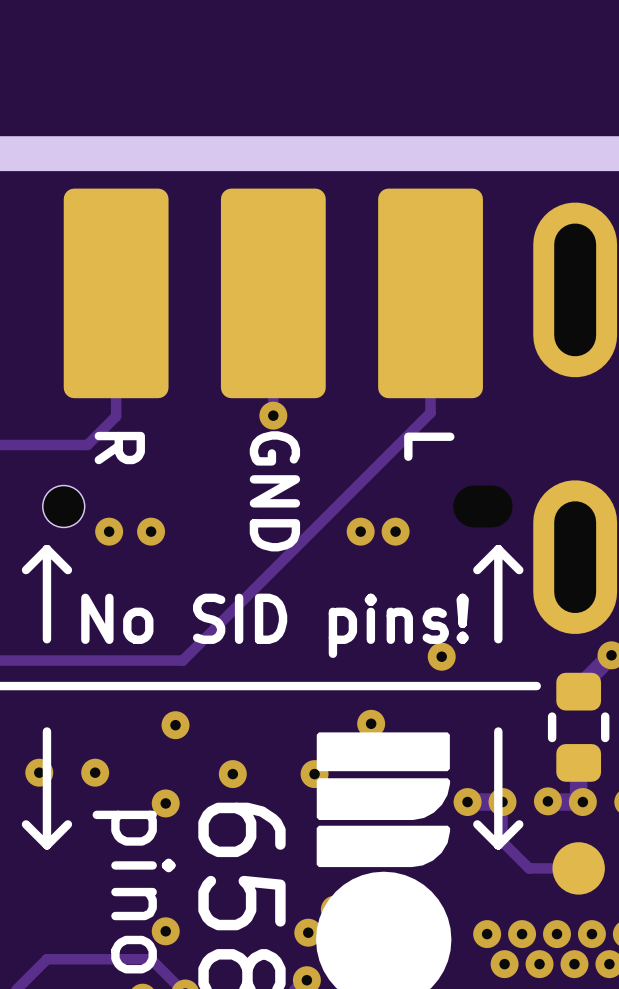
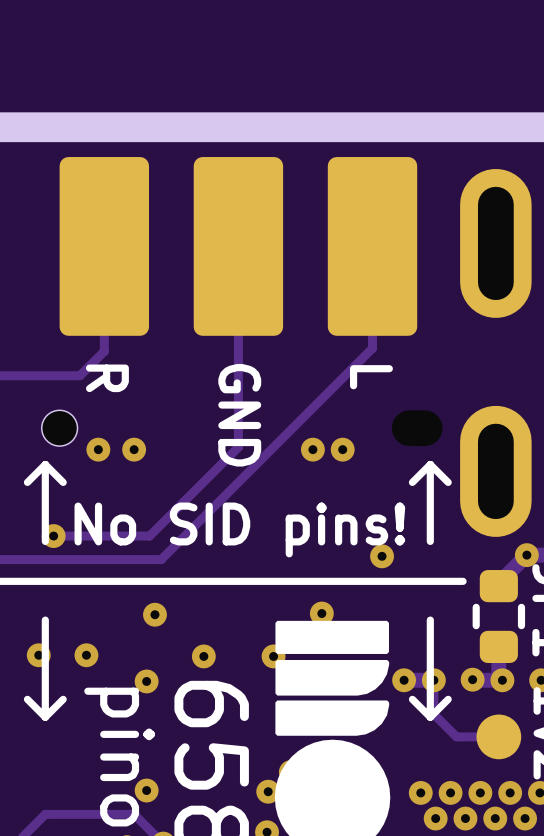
track: none -> (238, 350) (238, 447) (149, 536) (53, 536)
via position: (273, 415) -> (53, 536)

